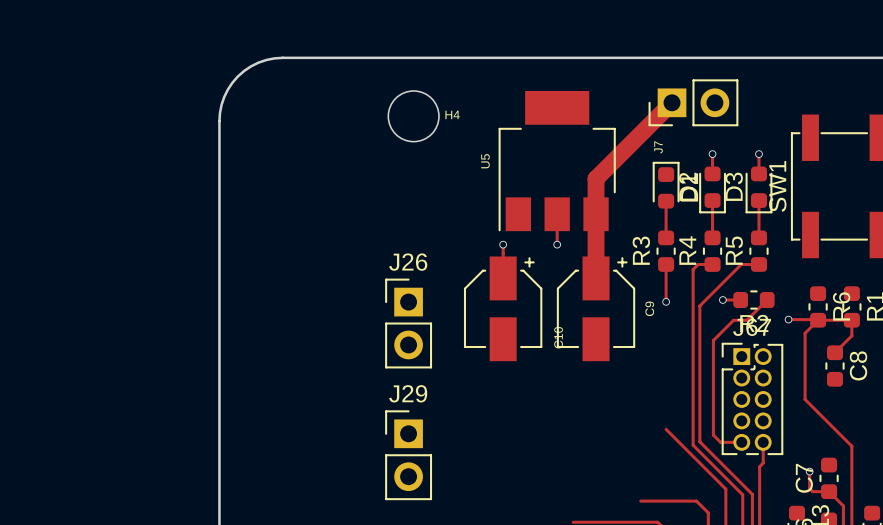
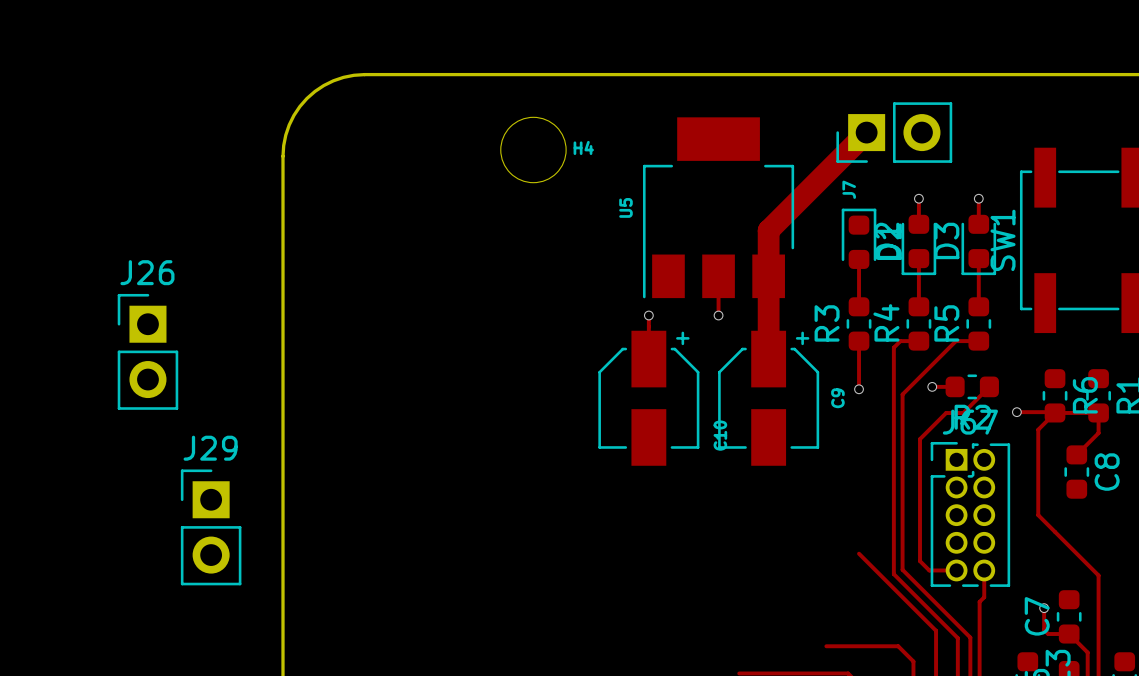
J26 position: (408, 323) -> (147, 351)
J29 position: (408, 455) -> (211, 527)

